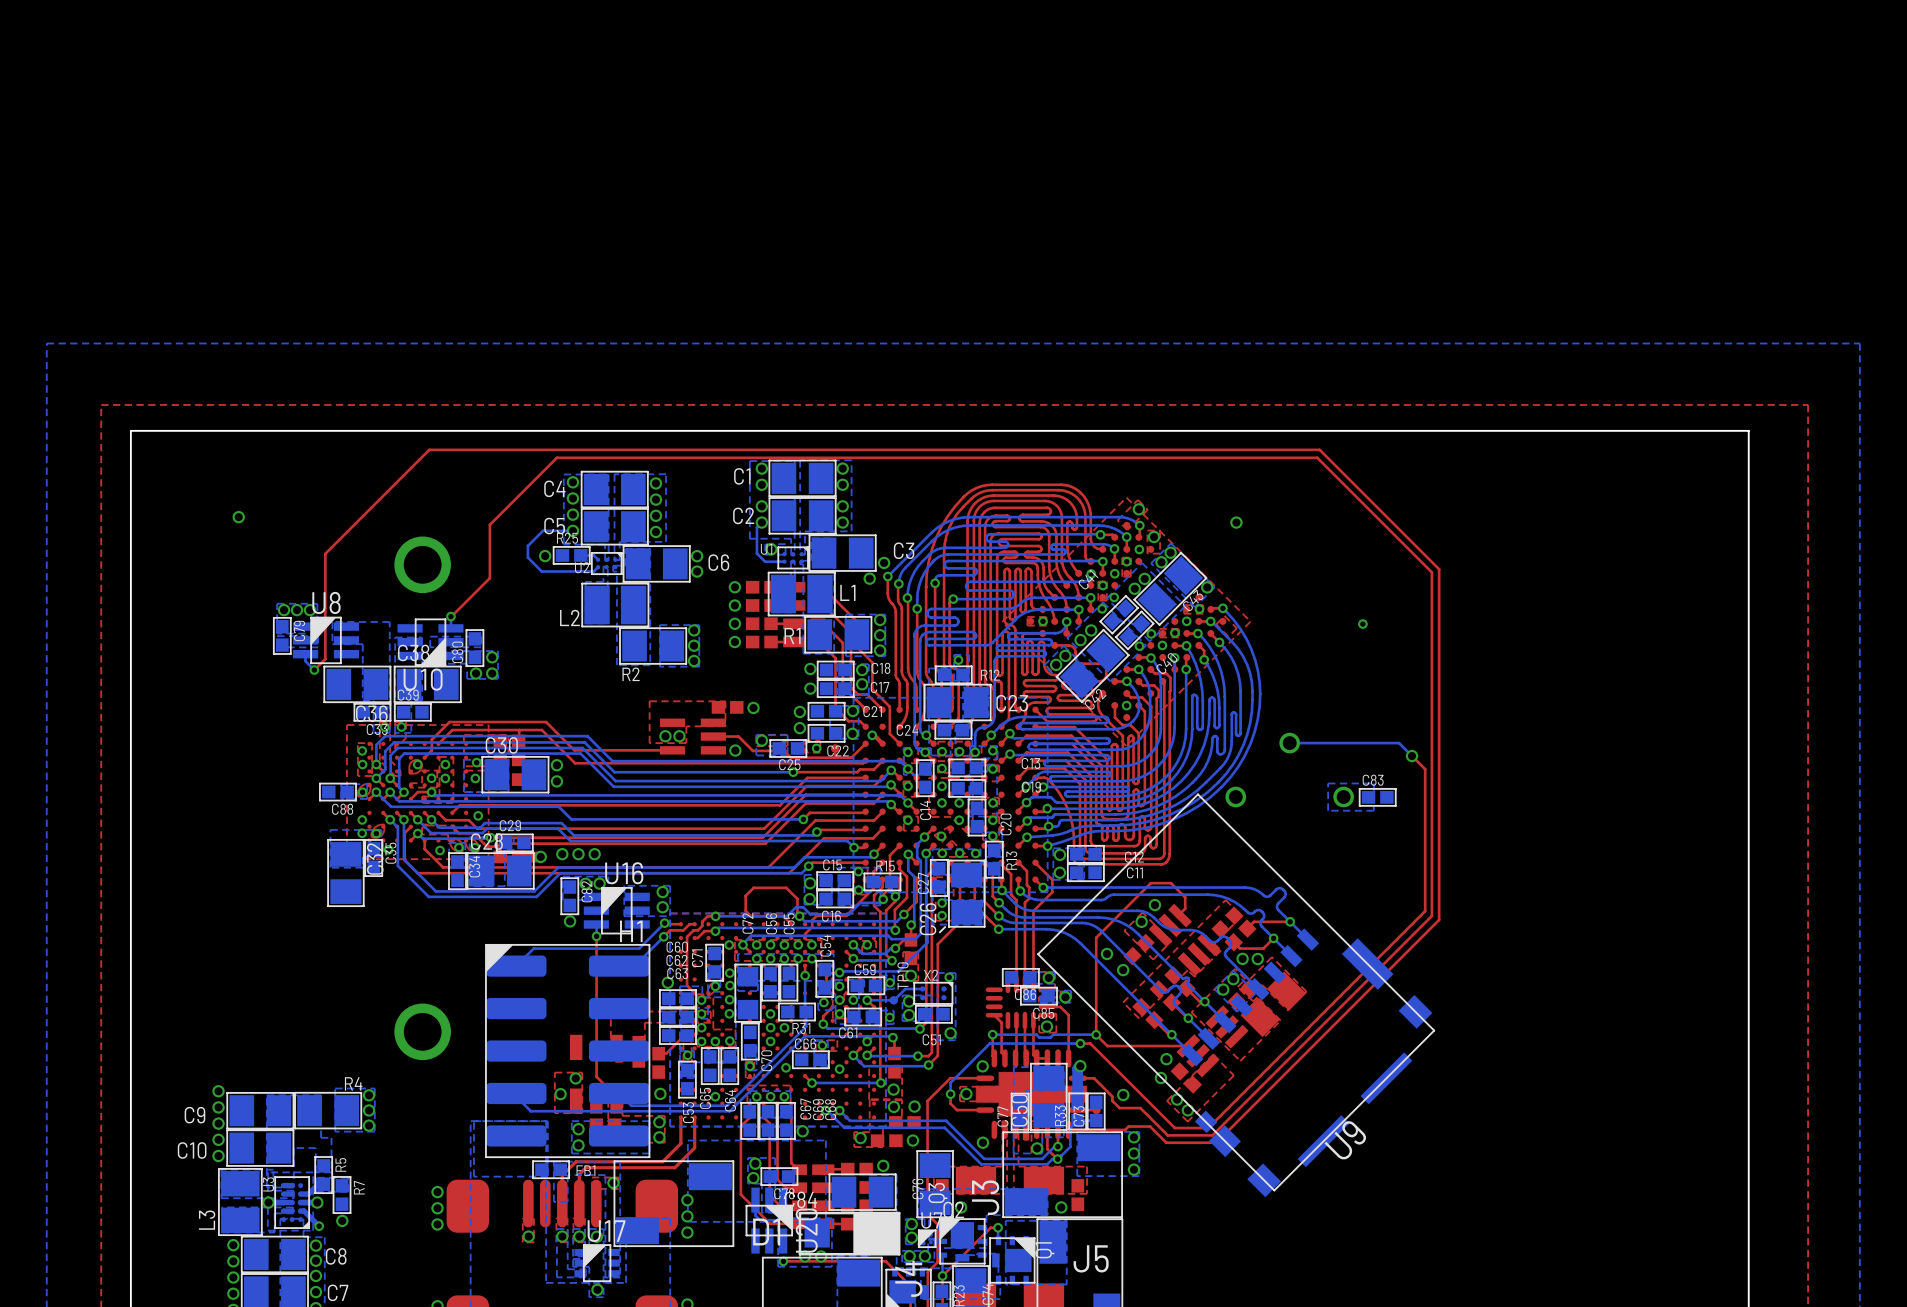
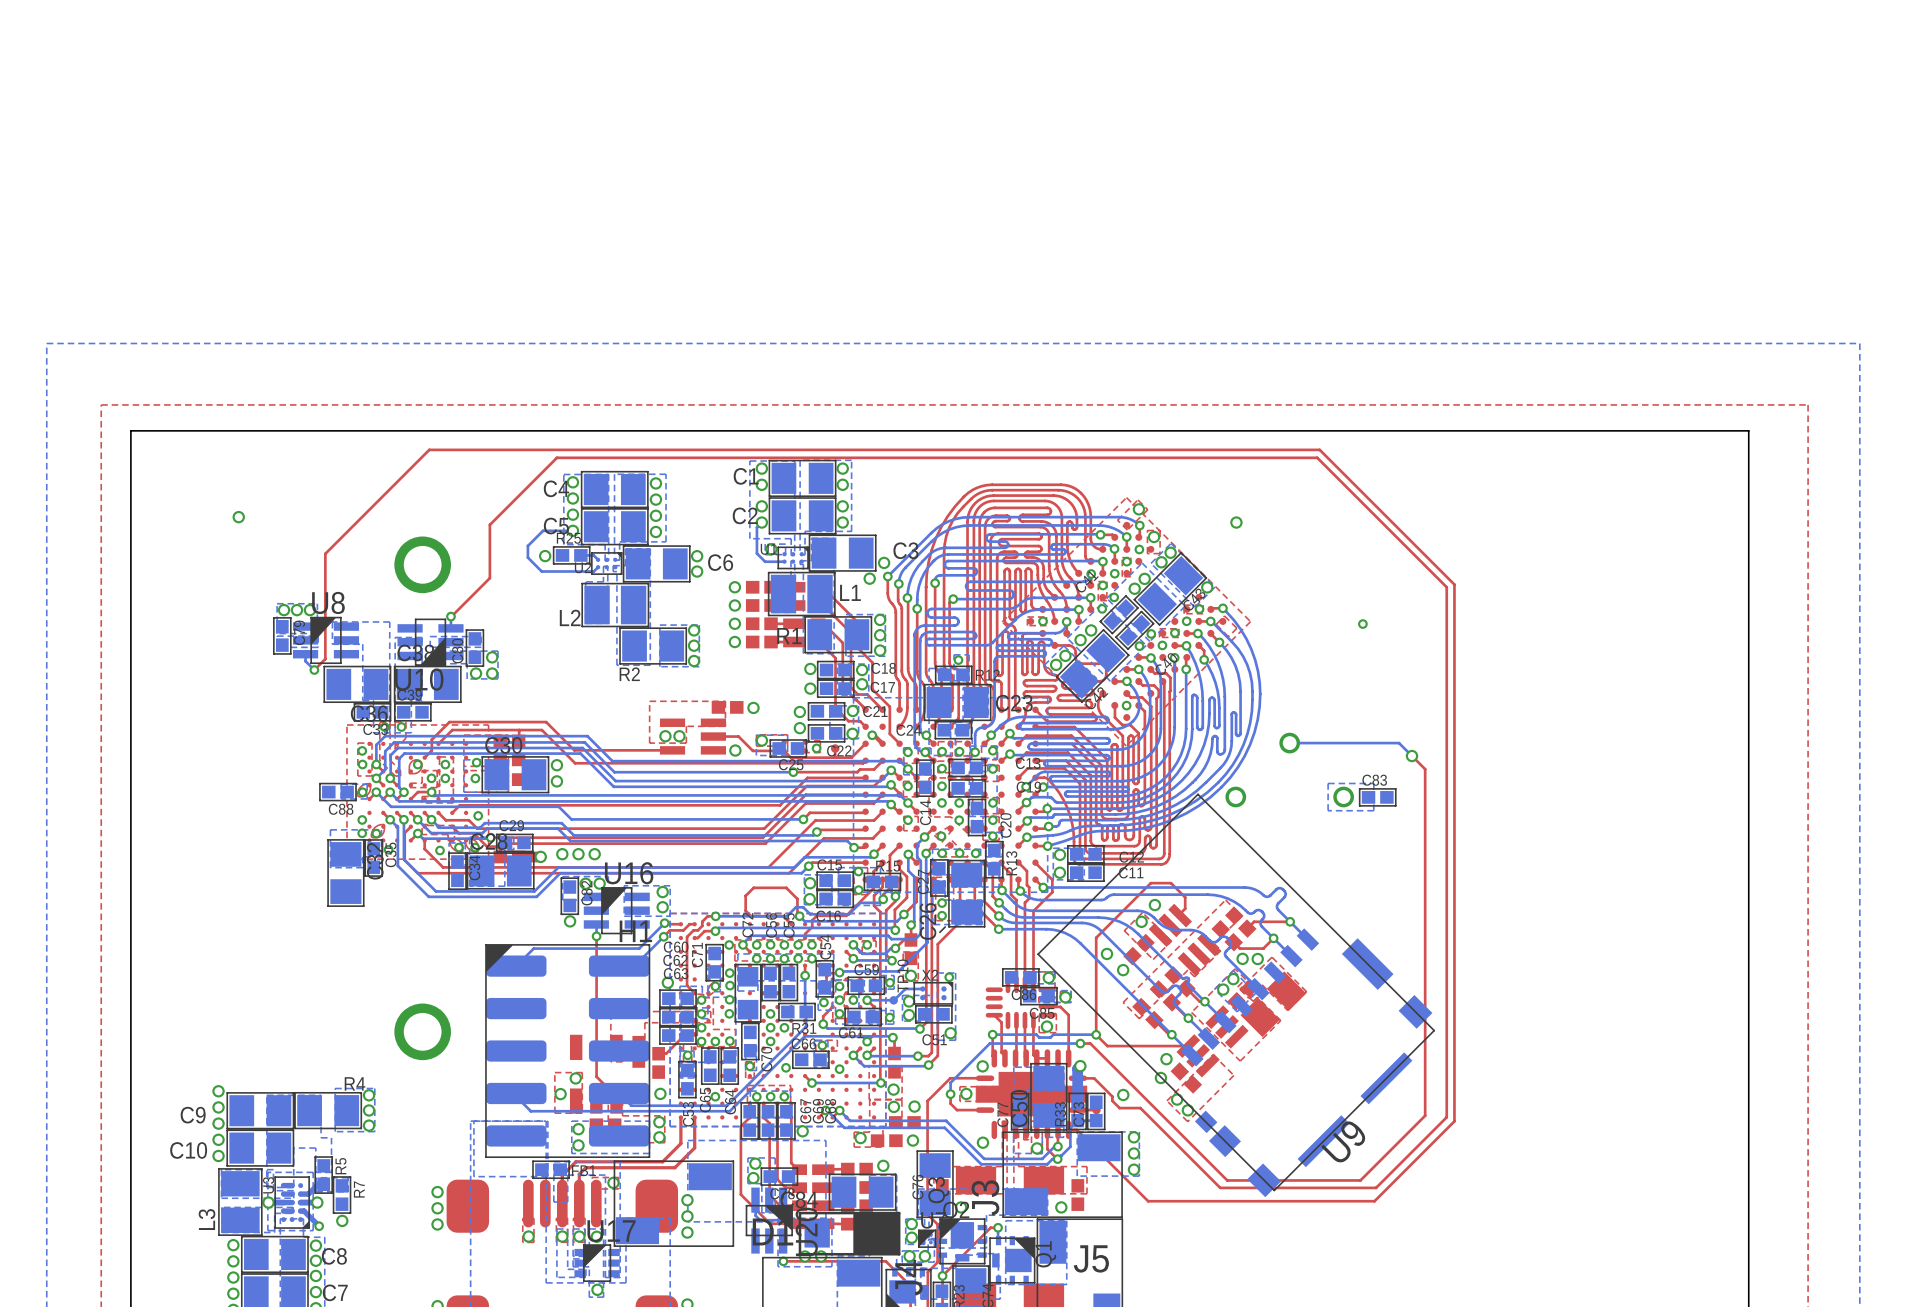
top track: (1439, 569) (1439, 919) (1216, 1142) (1166, 1142) (1150, 1126) (1128, 1126) (1125, 1129) (1076, 1129) -> (1439, 569) (1454, 584) (1454, 1121) (1374, 1201) (1148, 1201) (1076, 1129)
top track: (1431, 572) (1431, 915) (1212, 1135) (1167, 1135) -> (1431, 572) (1446, 587) (1446, 1117) (1376, 1187) (1220, 1187) (1167, 1135)
top track: (1425, 911) (1208, 1128) (1174, 1128) -> (1425, 911) (1425, 1115) (1360, 1180) (1227, 1180) (1174, 1128)

